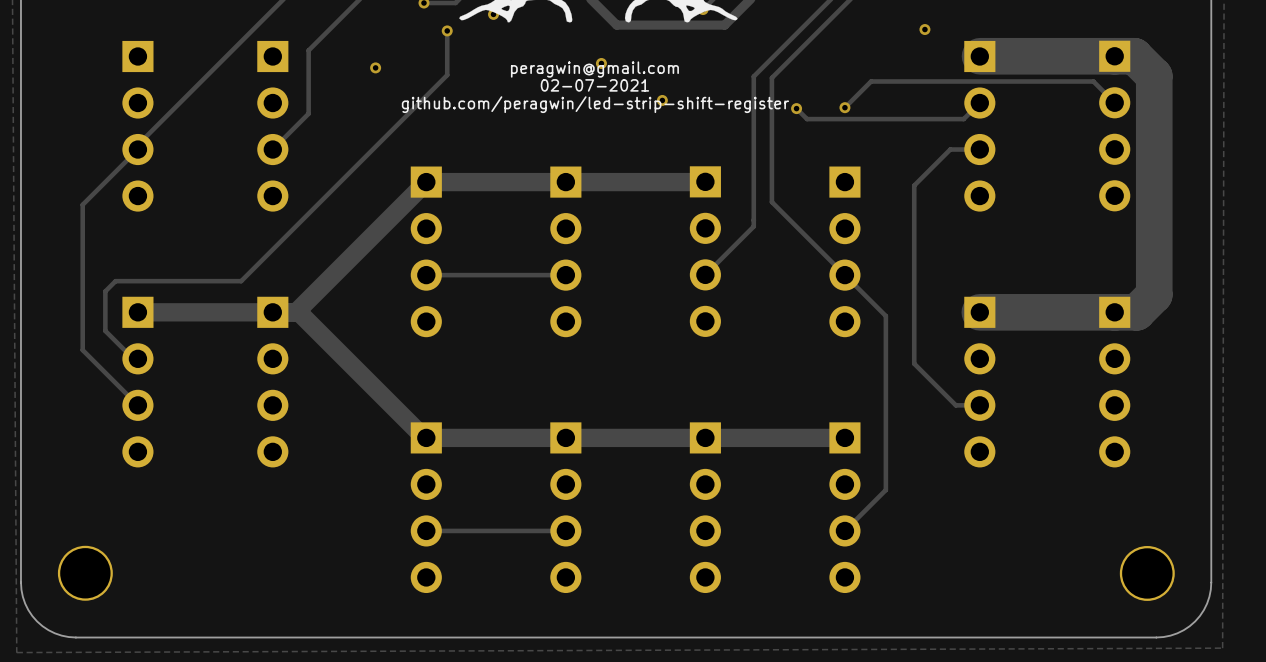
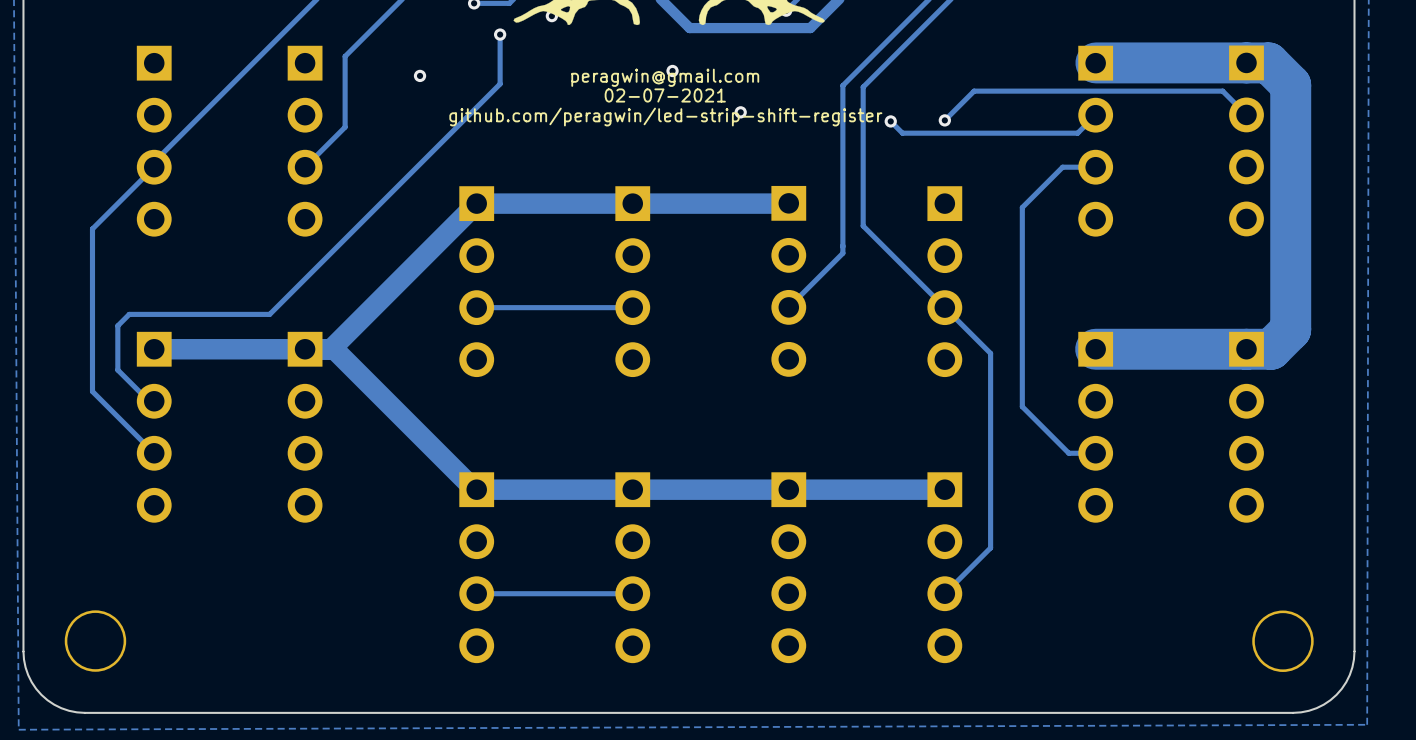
via: (924, 29) -> none

